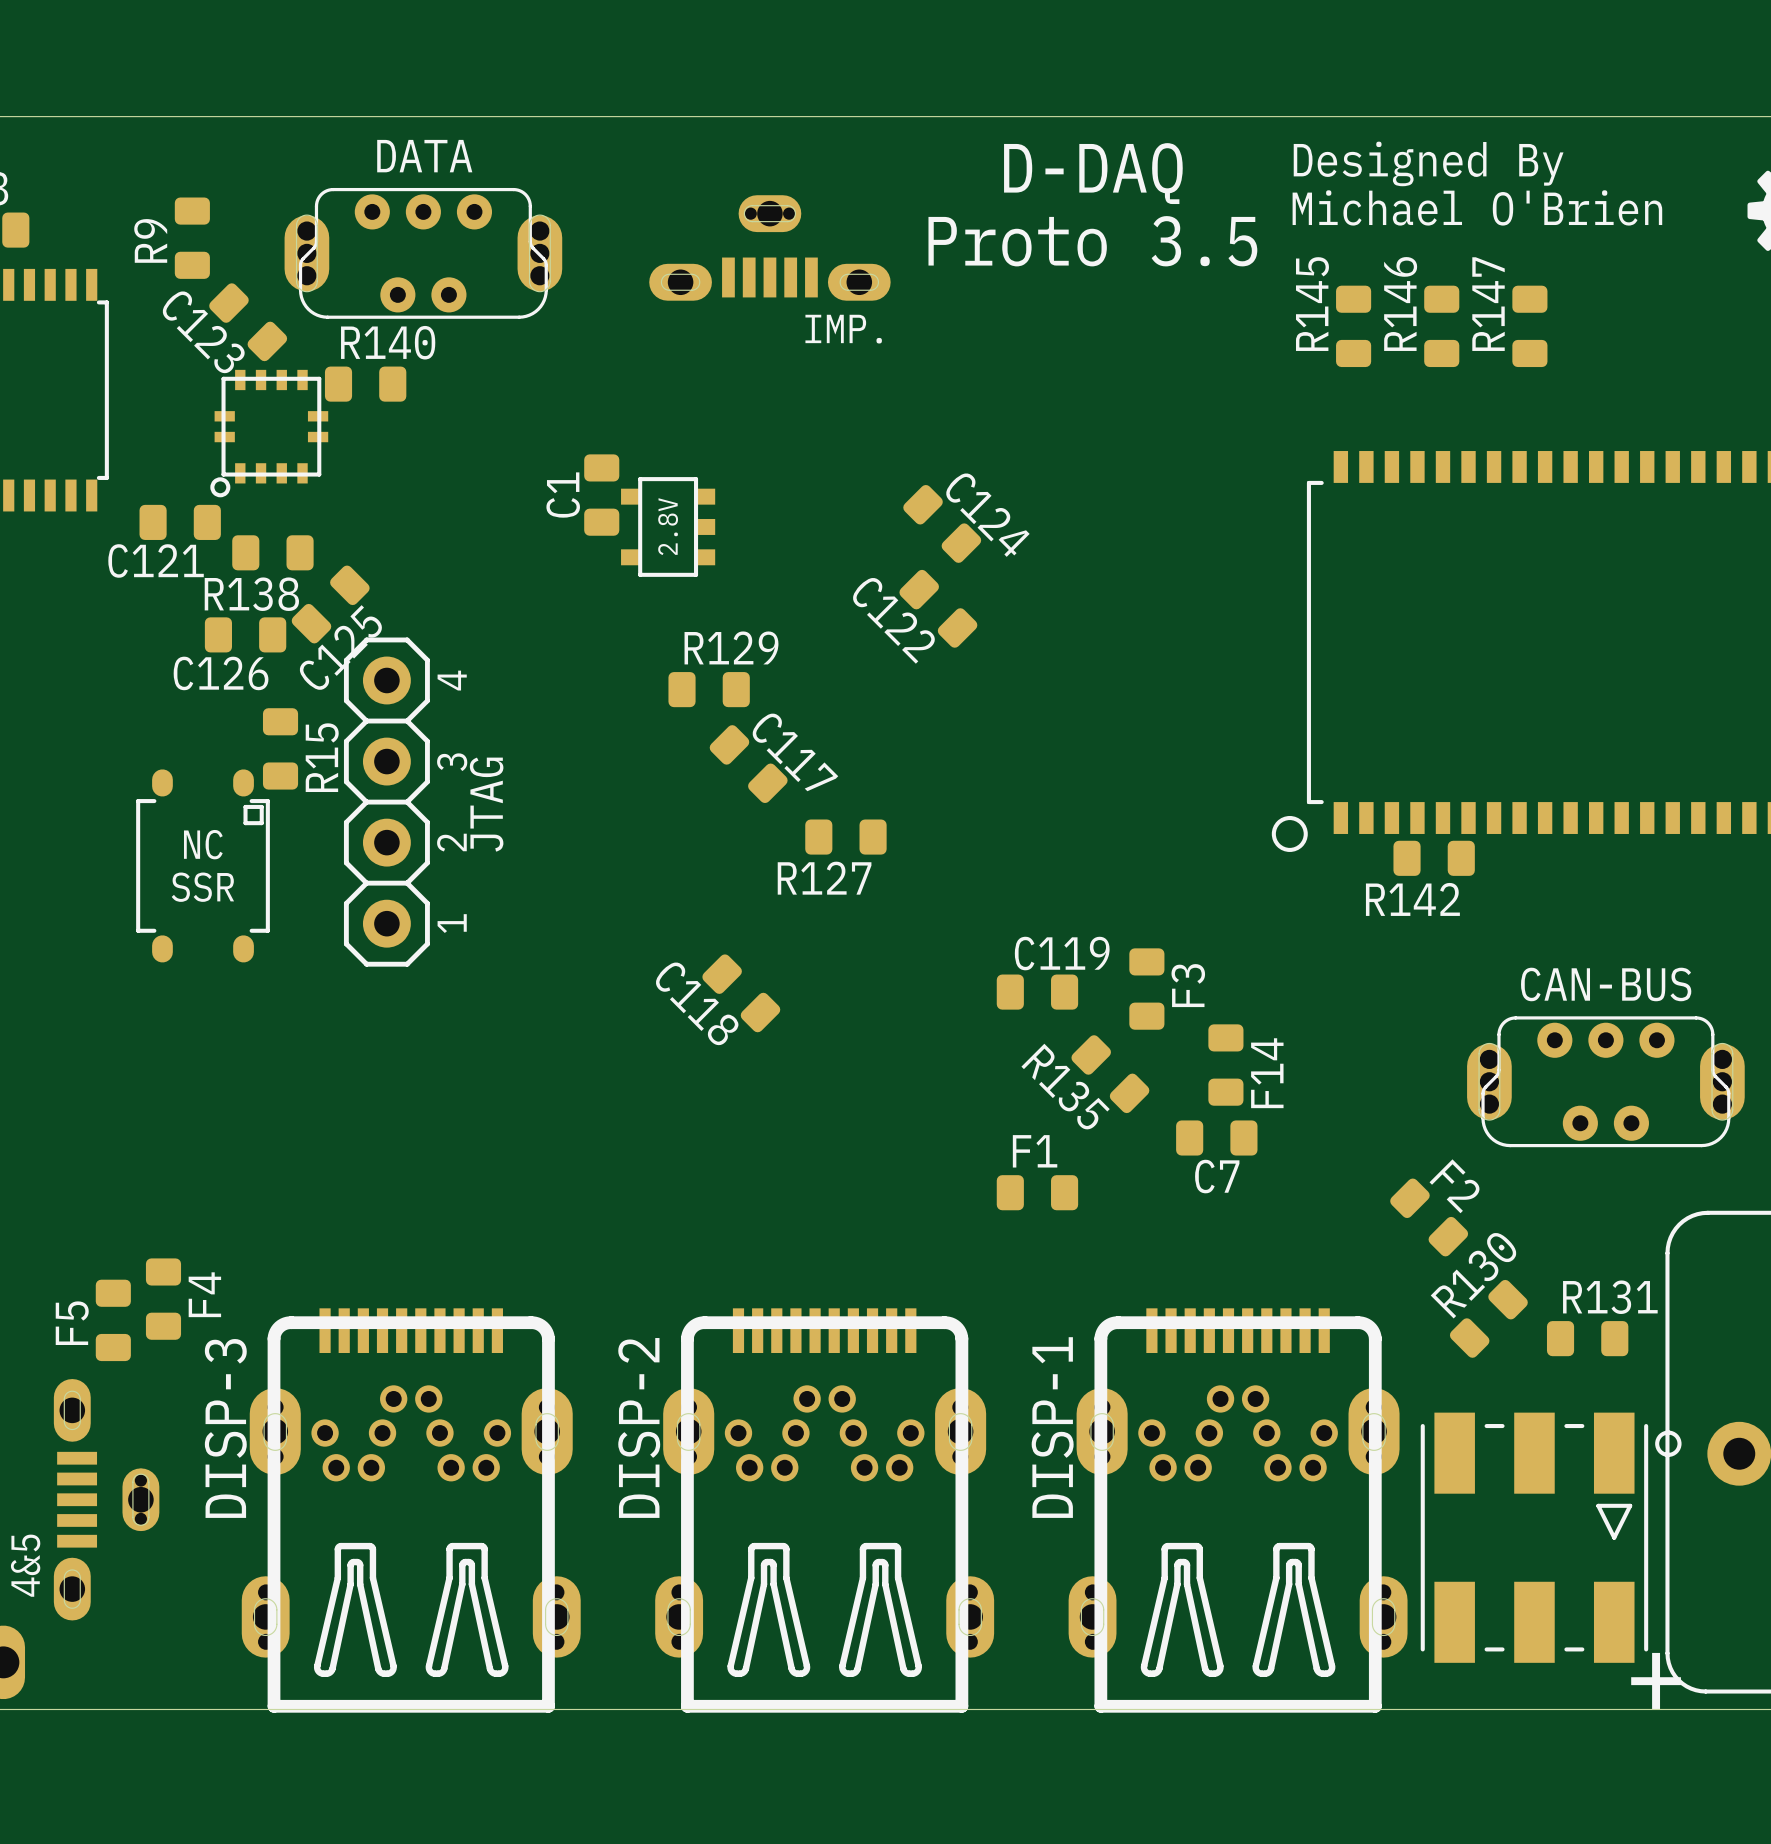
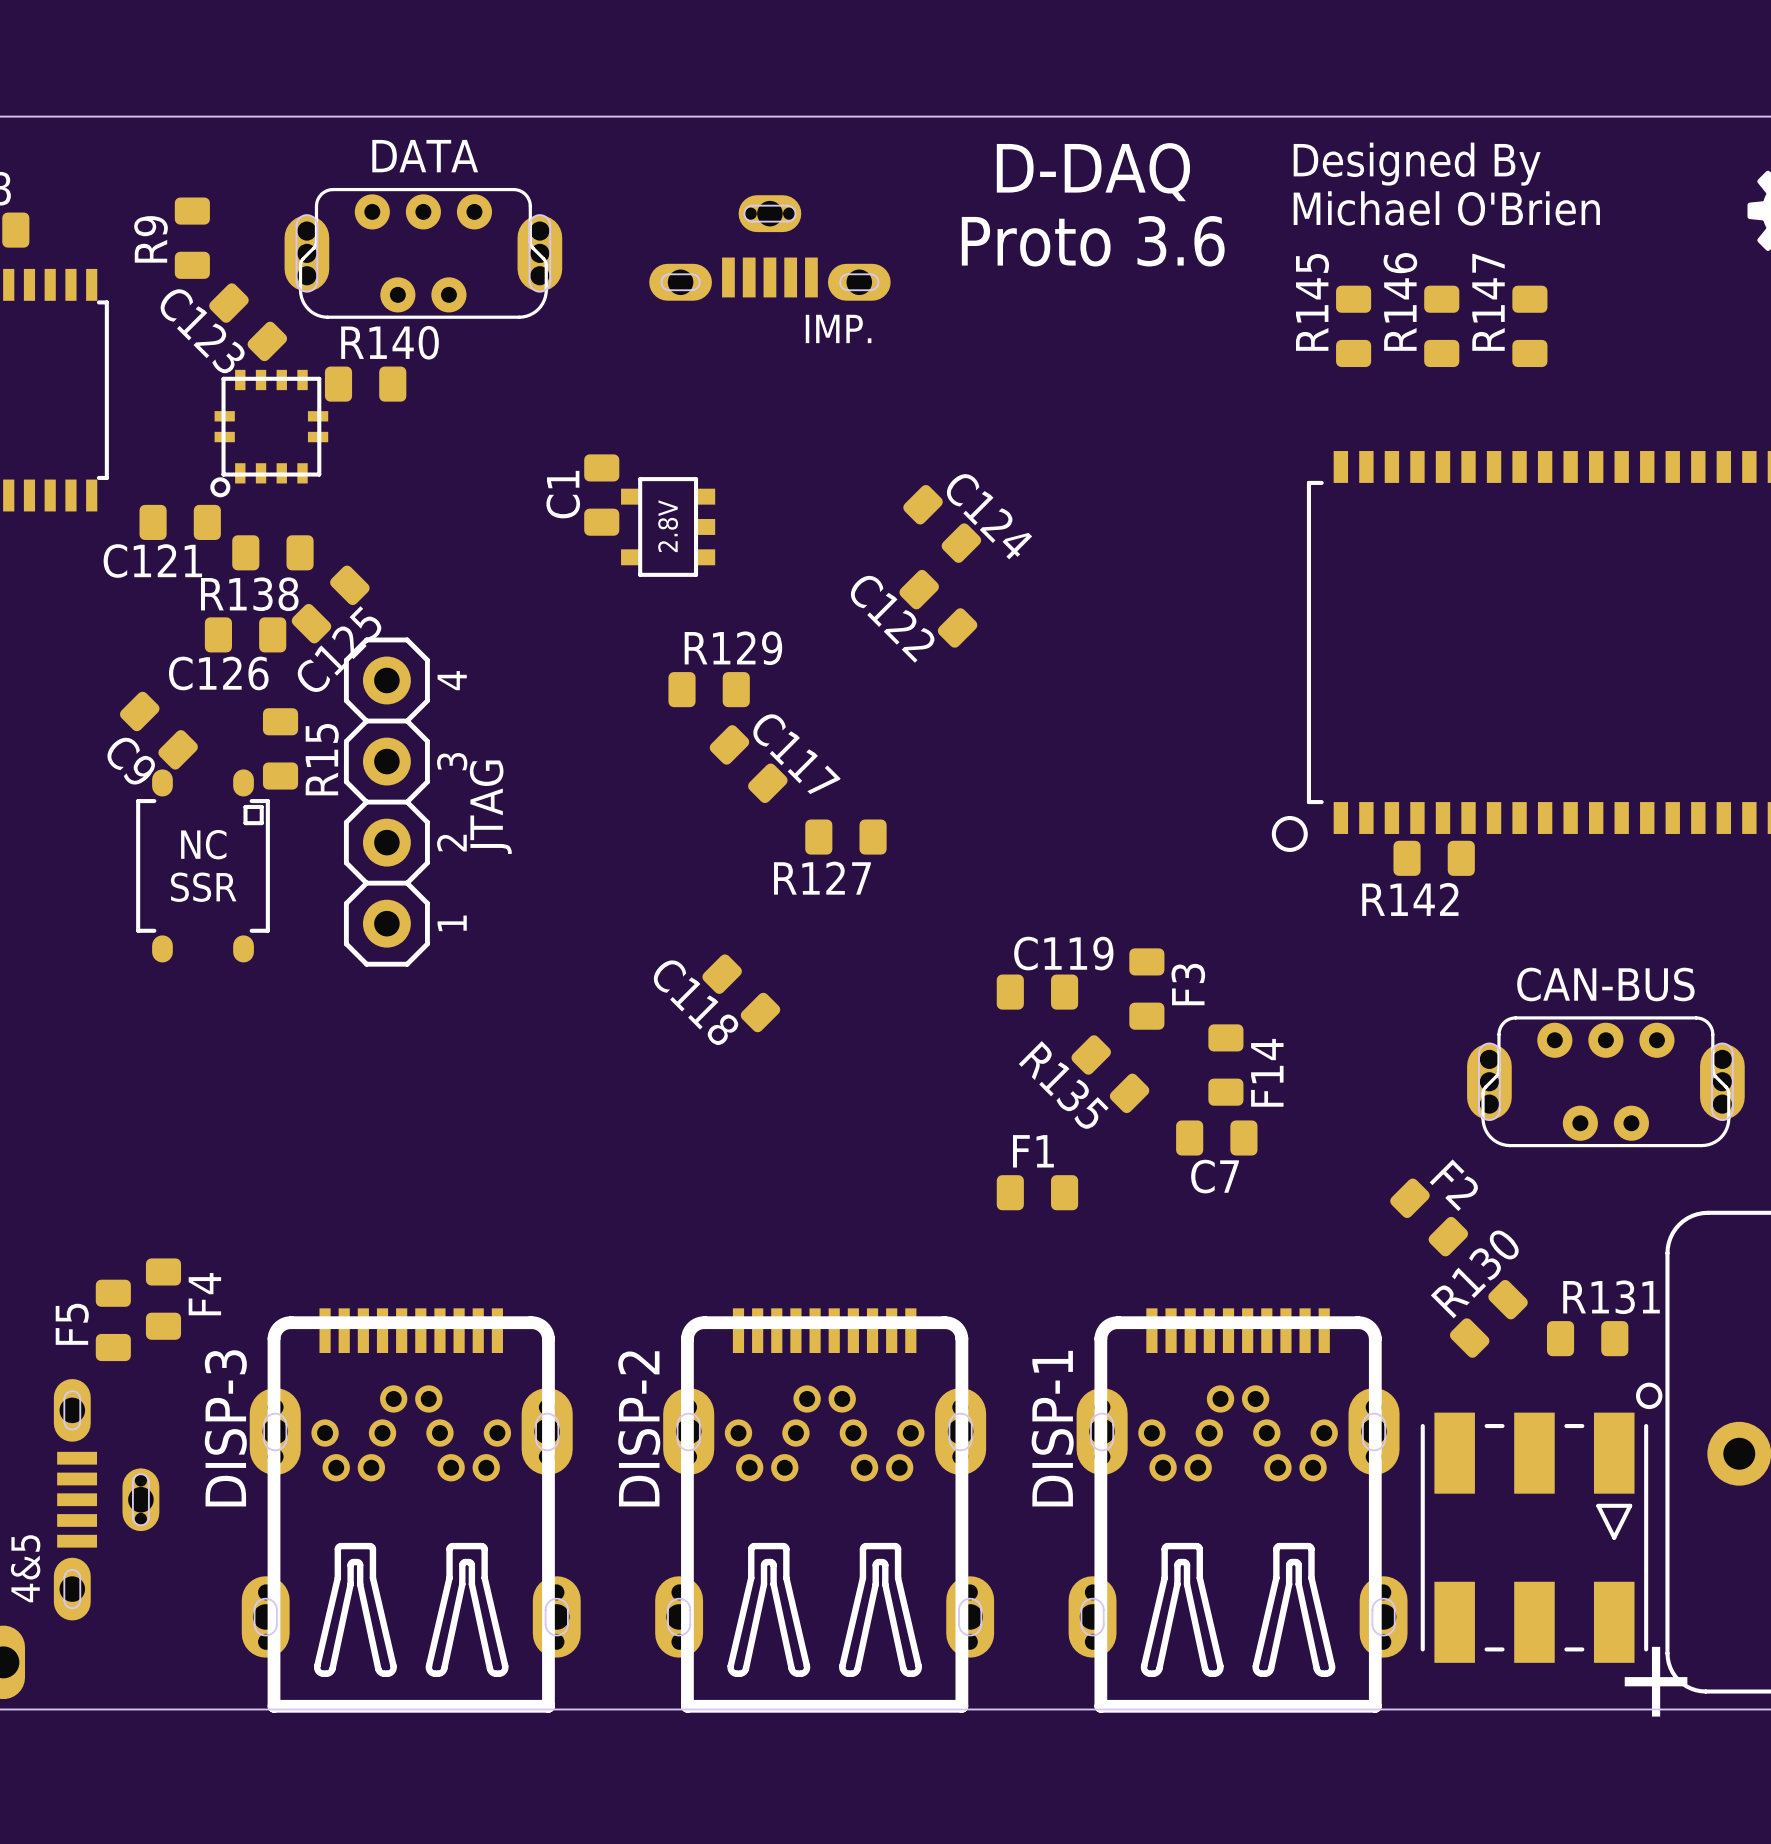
text: Proto 3.5 (1092, 241) -> Proto 3.6 (1093, 241)
C9: none -> (158, 730)
part footprint: [1420, 1412, 1682, 1663] -> [1420, 1382, 1663, 1663]

